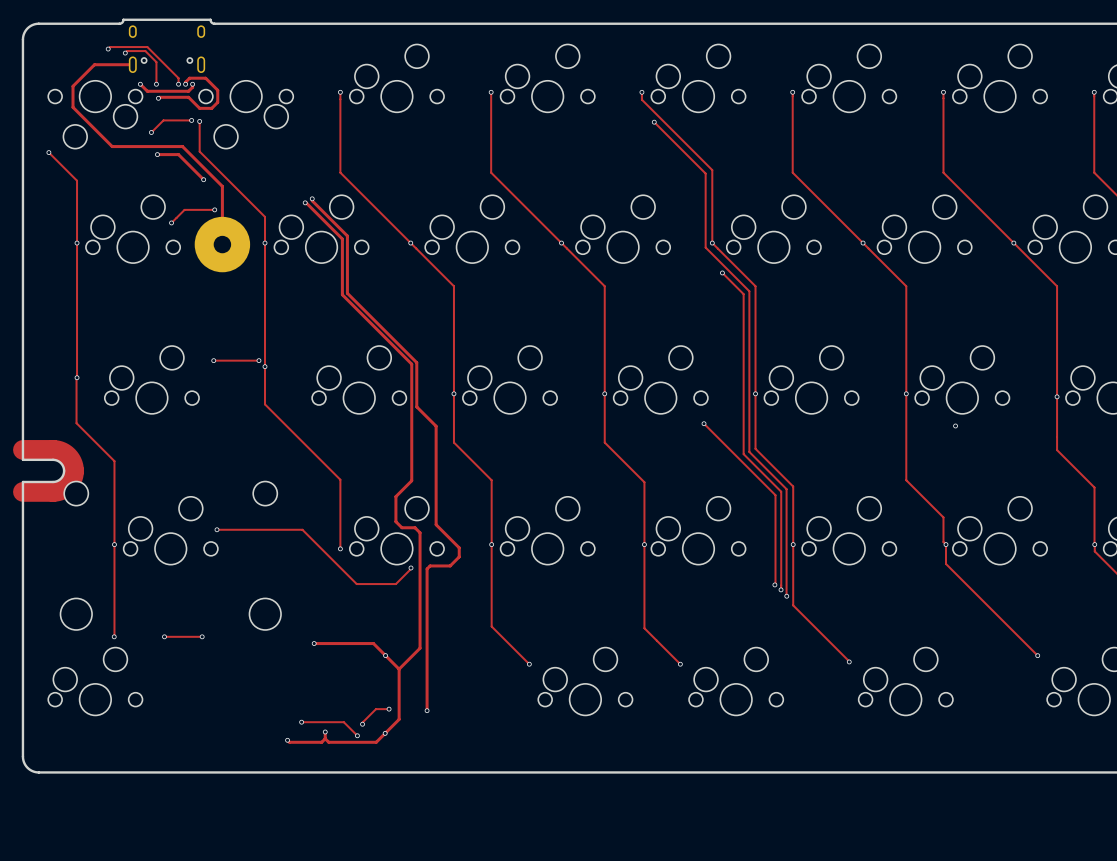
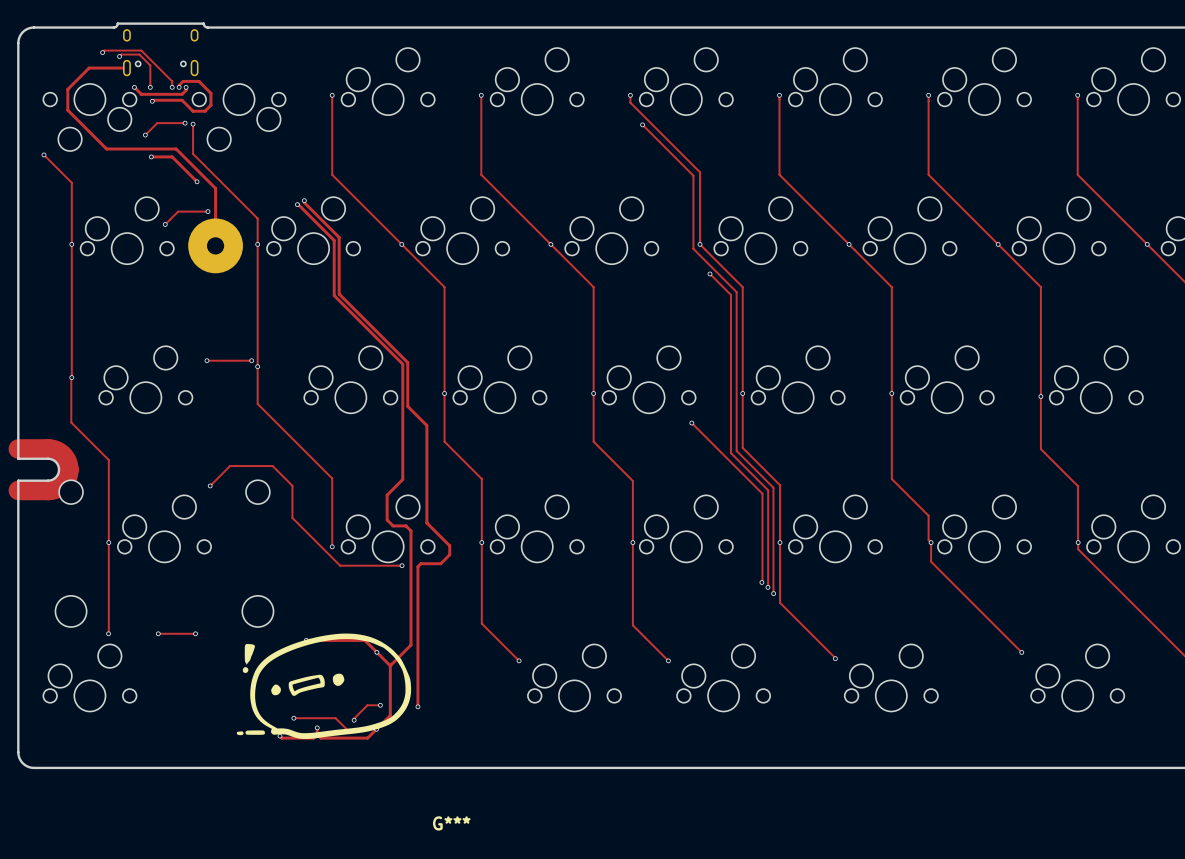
via: (955, 425) -> none
track: (217, 529) (302, 529) (356, 584) (395, 584) (411, 567) -> (210, 485) (230, 466) (272, 466) (292, 485) (292, 517) (340, 565) (402, 565)
via position: (217, 529) -> (210, 485)
G***: none -> (323, 686)

